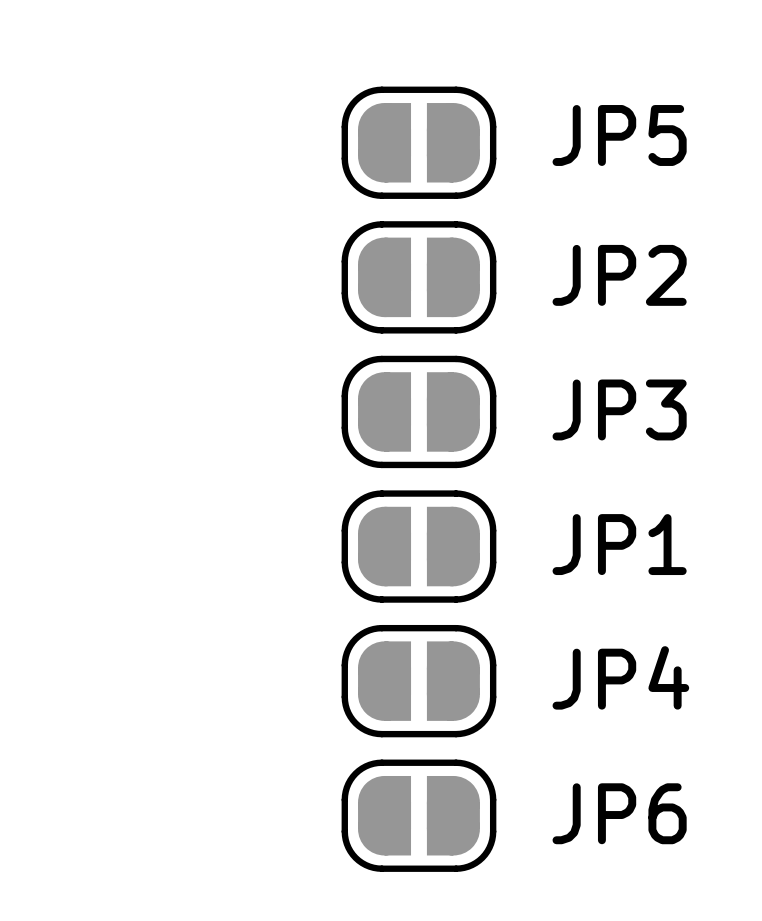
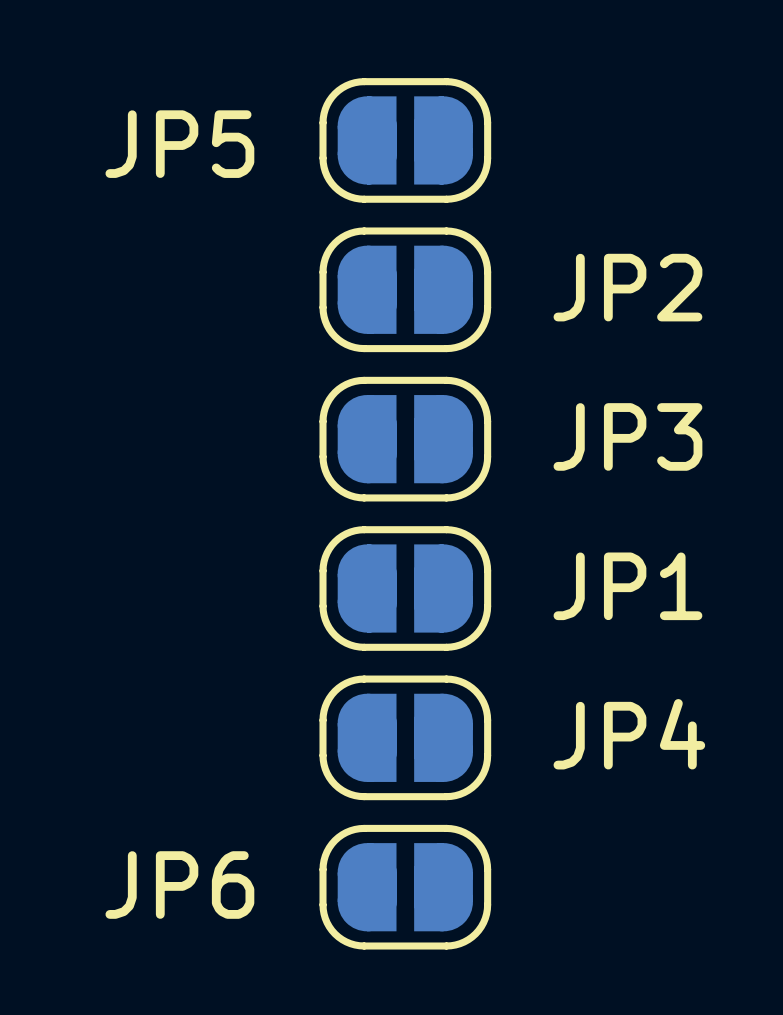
JP5 name position: JP5 (619, 135) -> JP5 (179, 144)
JP6 name position: JP6 (619, 813) -> JP6 (179, 885)

